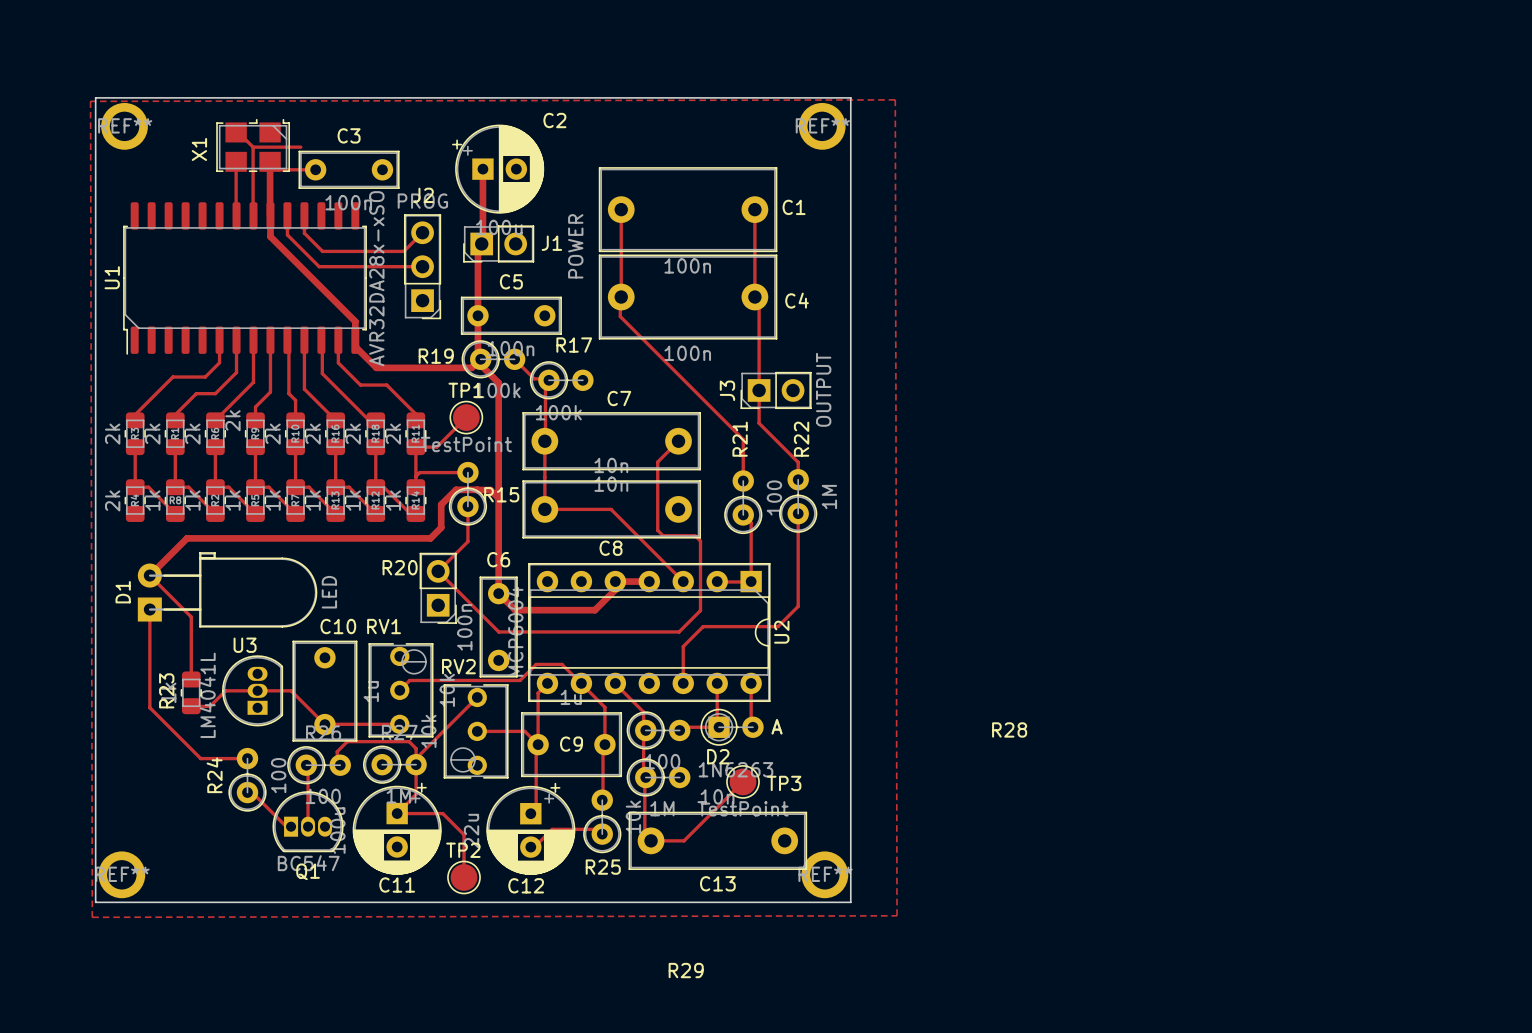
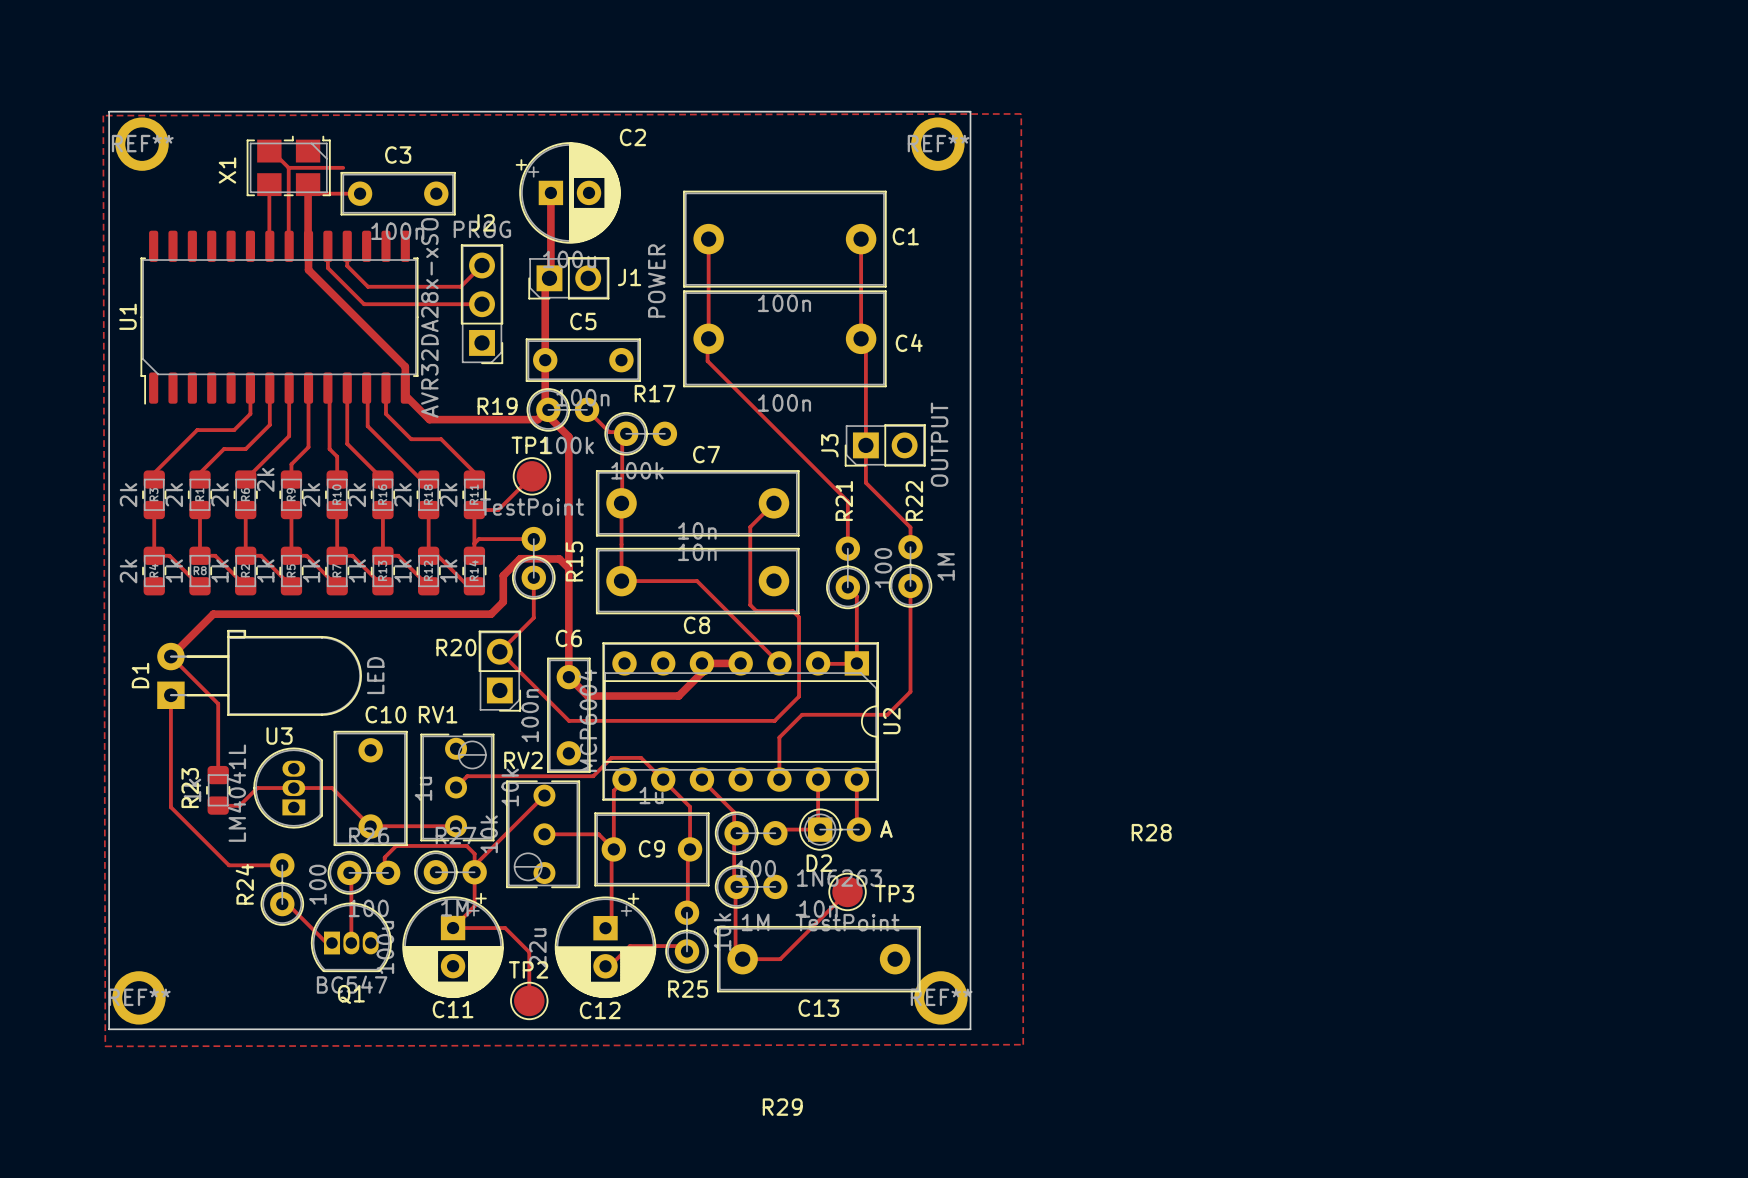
R15 name rotation: 0° (501, 494) -> 90° counterclockwise (574, 561)

